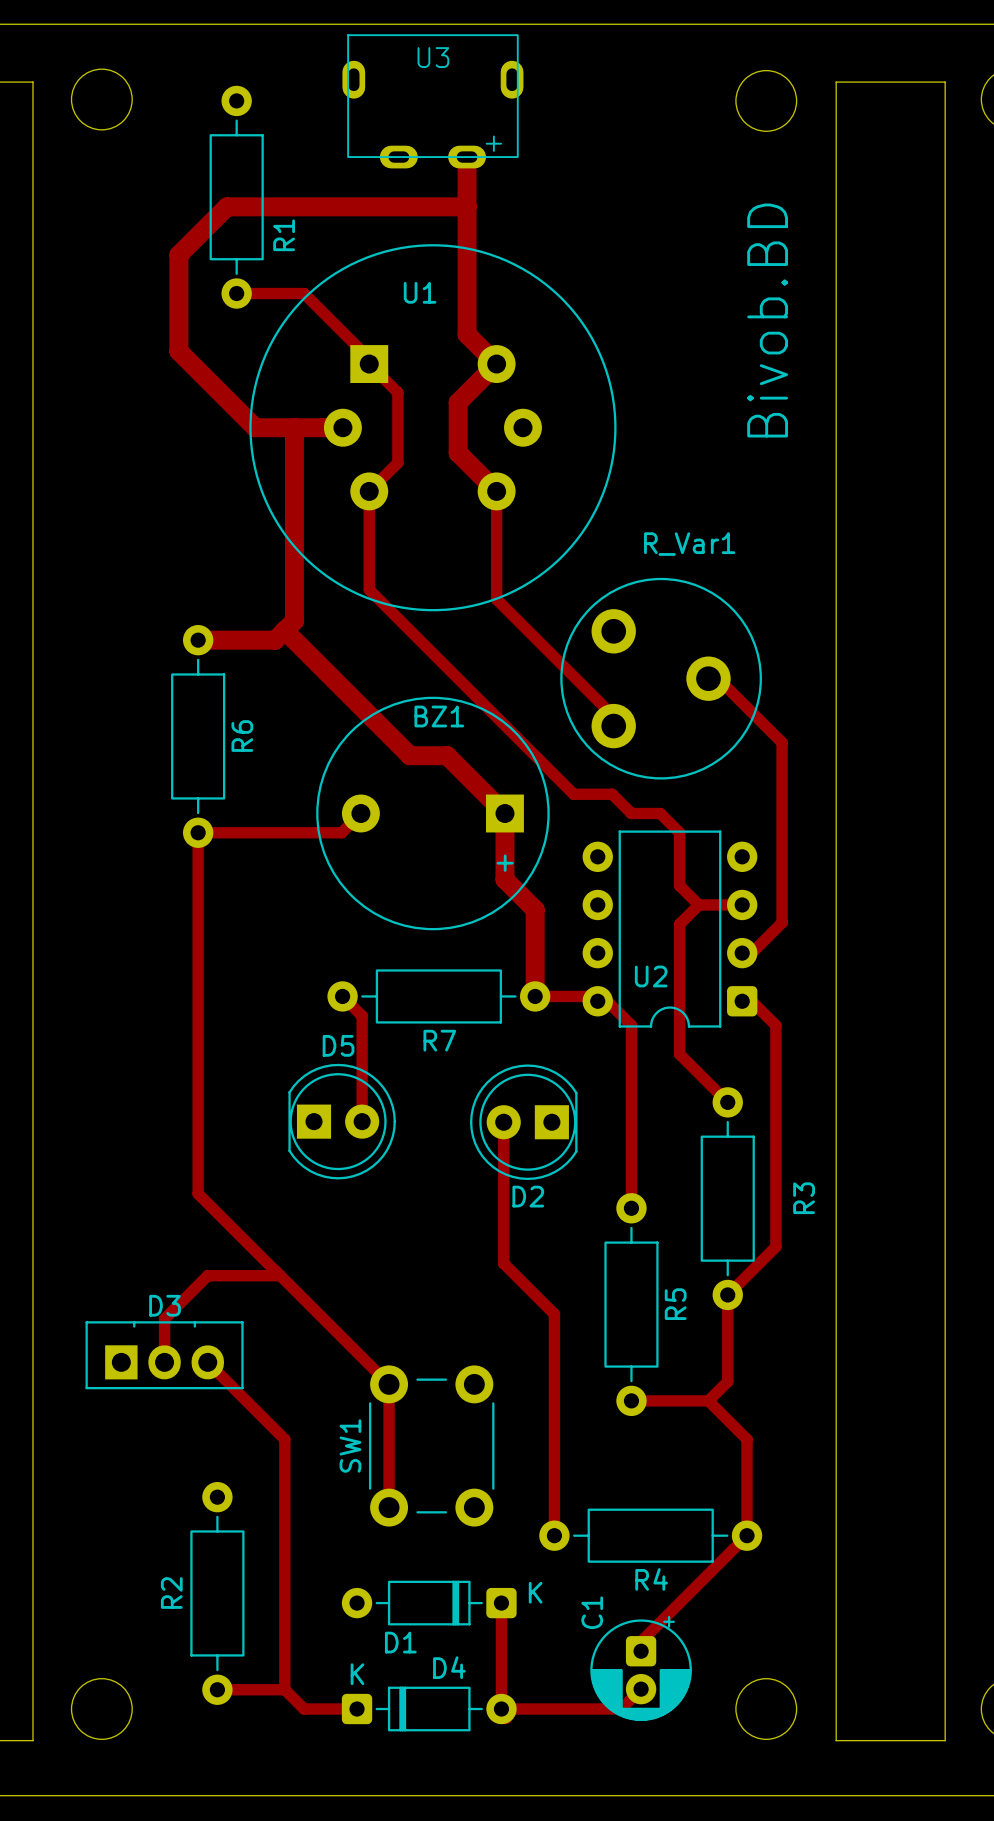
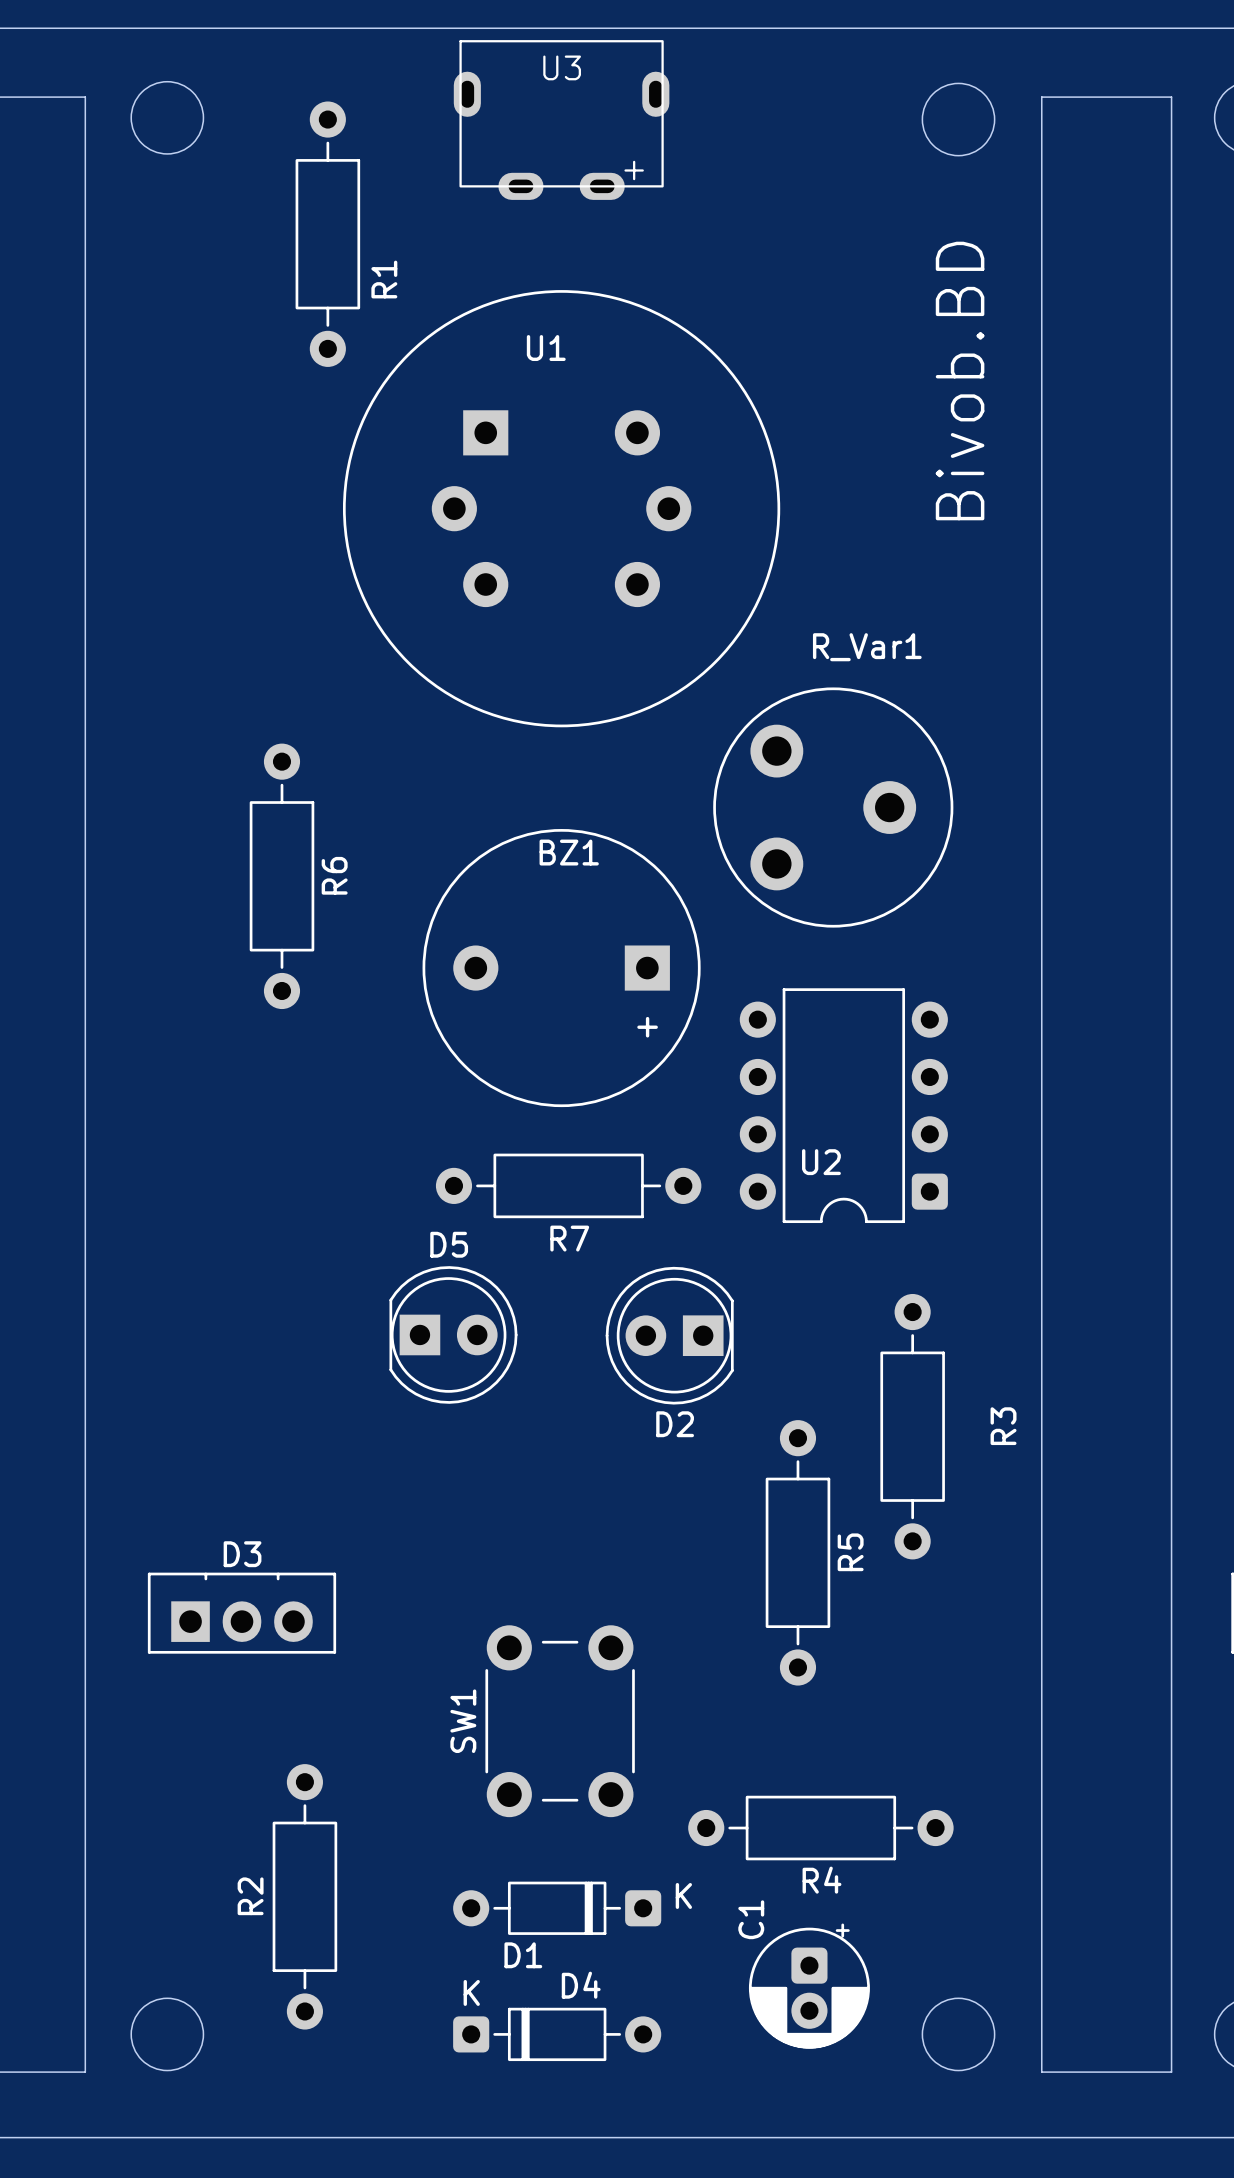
track: (467, 157) (467, 334) (496, 364) (458, 402) (458, 452) (496, 491) (496, 599) (623, 726) -> none
track: (467, 206) (227, 206) (178, 255) (178, 351) (255, 427) (342, 427) -> none
track: (236, 293) (304, 293) (369, 358) (369, 364) (397, 392) (397, 462) (369, 491) (369, 589) (573, 794) (612, 794) (631, 813) (660, 813) (679, 832) (679, 885) (698, 904) -> none
track: (294, 427) (294, 620) (275, 640) (198, 640) -> none
track: (284, 630) (409, 755) (447, 755) (504, 813) (504, 879) (535, 909) (535, 996) (602, 996) (631, 1025) (631, 1208) -> none
track: (708, 678) (718, 678) (782, 742) (782, 922) (751, 953) -> none
track: (360, 813) (341, 832) (198, 832) (198, 1193) (275, 1270) -> none
track: (698, 904) (742, 904) -> none
track: (698, 904) (679, 924) (679, 1054) (727, 1102) -> none
track: (342, 996) (362, 1016) (362, 1121) -> none
track: (751, 1001) (775, 1025) (775, 1246) (727, 1294) (727, 1381) (708, 1400) -> none
track: (503, 1122) (503, 1263) (554, 1314) (554, 1535) -> none
track: (275, 1270) (389, 1384) (389, 1507) -> none
track: (280, 1275) (207, 1275) (164, 1318) (164, 1357) (169, 1362) (164, 1362) -> none
track: (207, 1362) (284, 1439) (284, 1689) -> none
track: (631, 1400) (708, 1400) -> none
track: (708, 1400) (747, 1439) (747, 1535) (641, 1641) (641, 1651) -> none
track: (501, 1603) (501, 1713) (506, 1718) -> none
track: (217, 1689) (284, 1689) -> none
track: (284, 1689) (304, 1709) (357, 1709) -> none
track: (641, 1689) (621, 1709) (501, 1709) -> none

